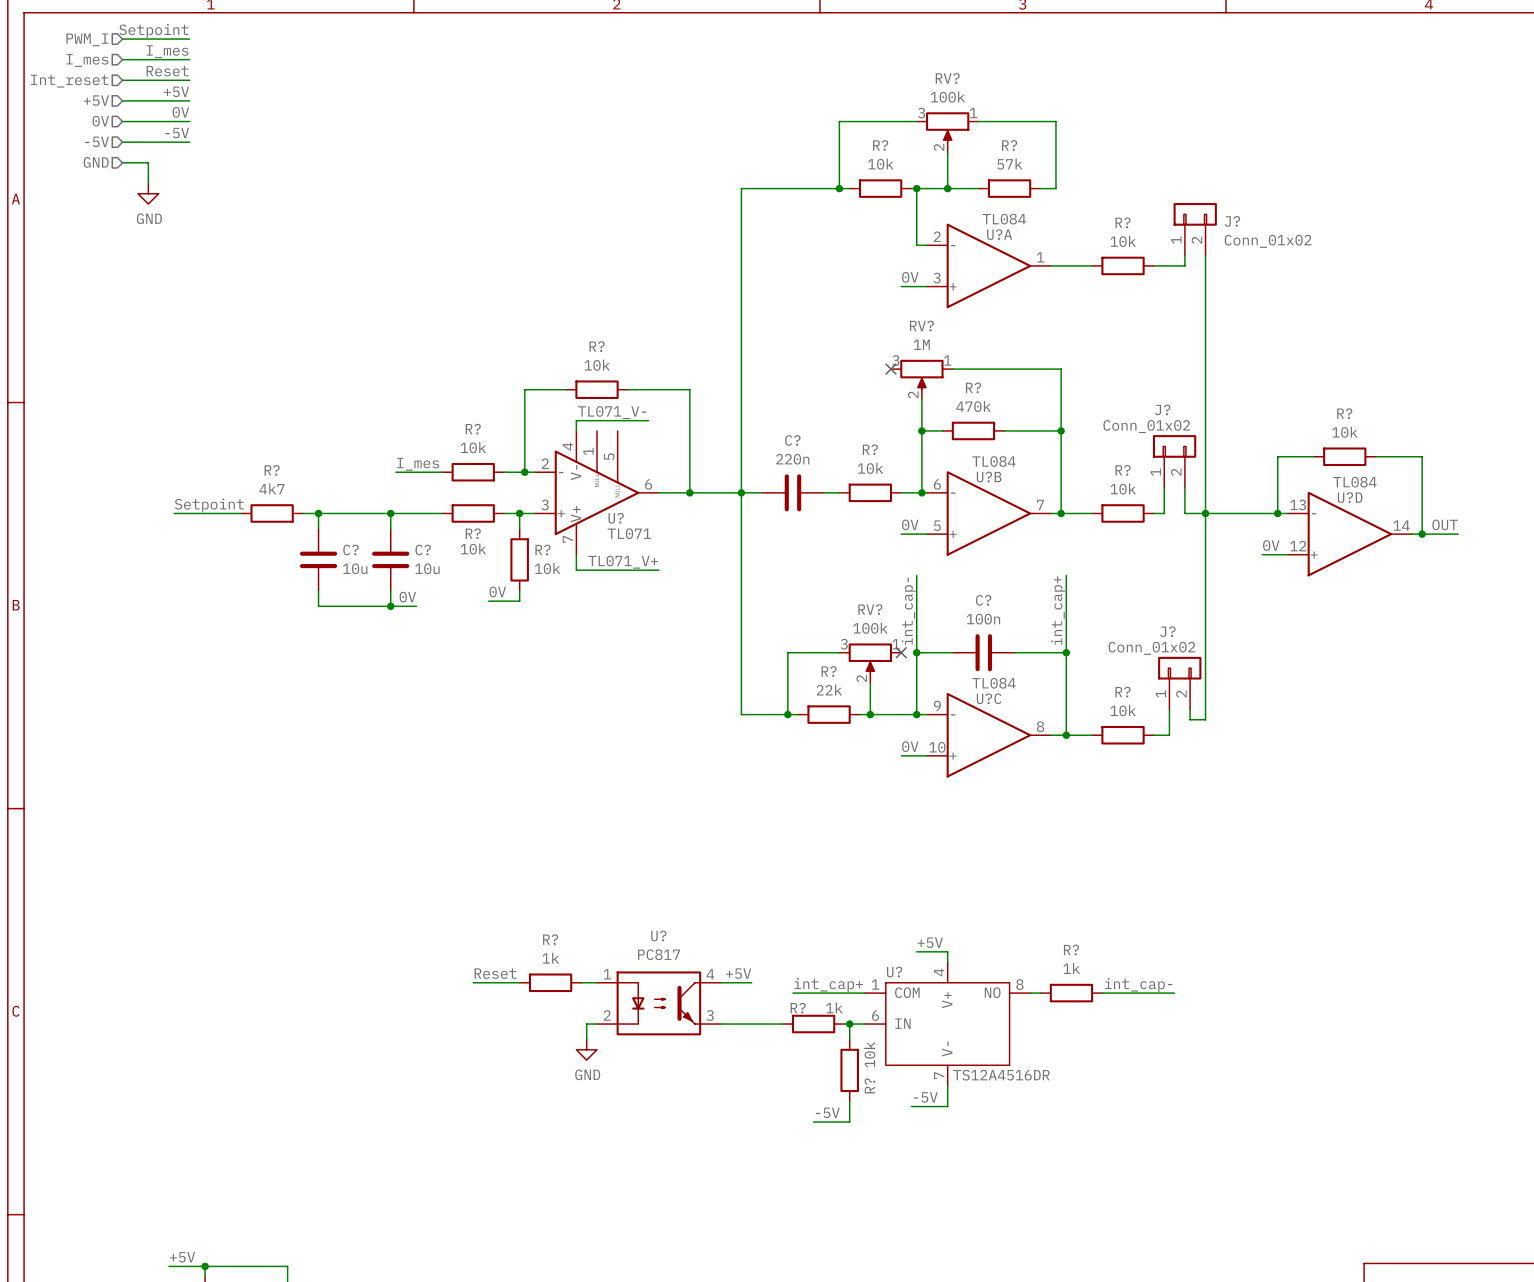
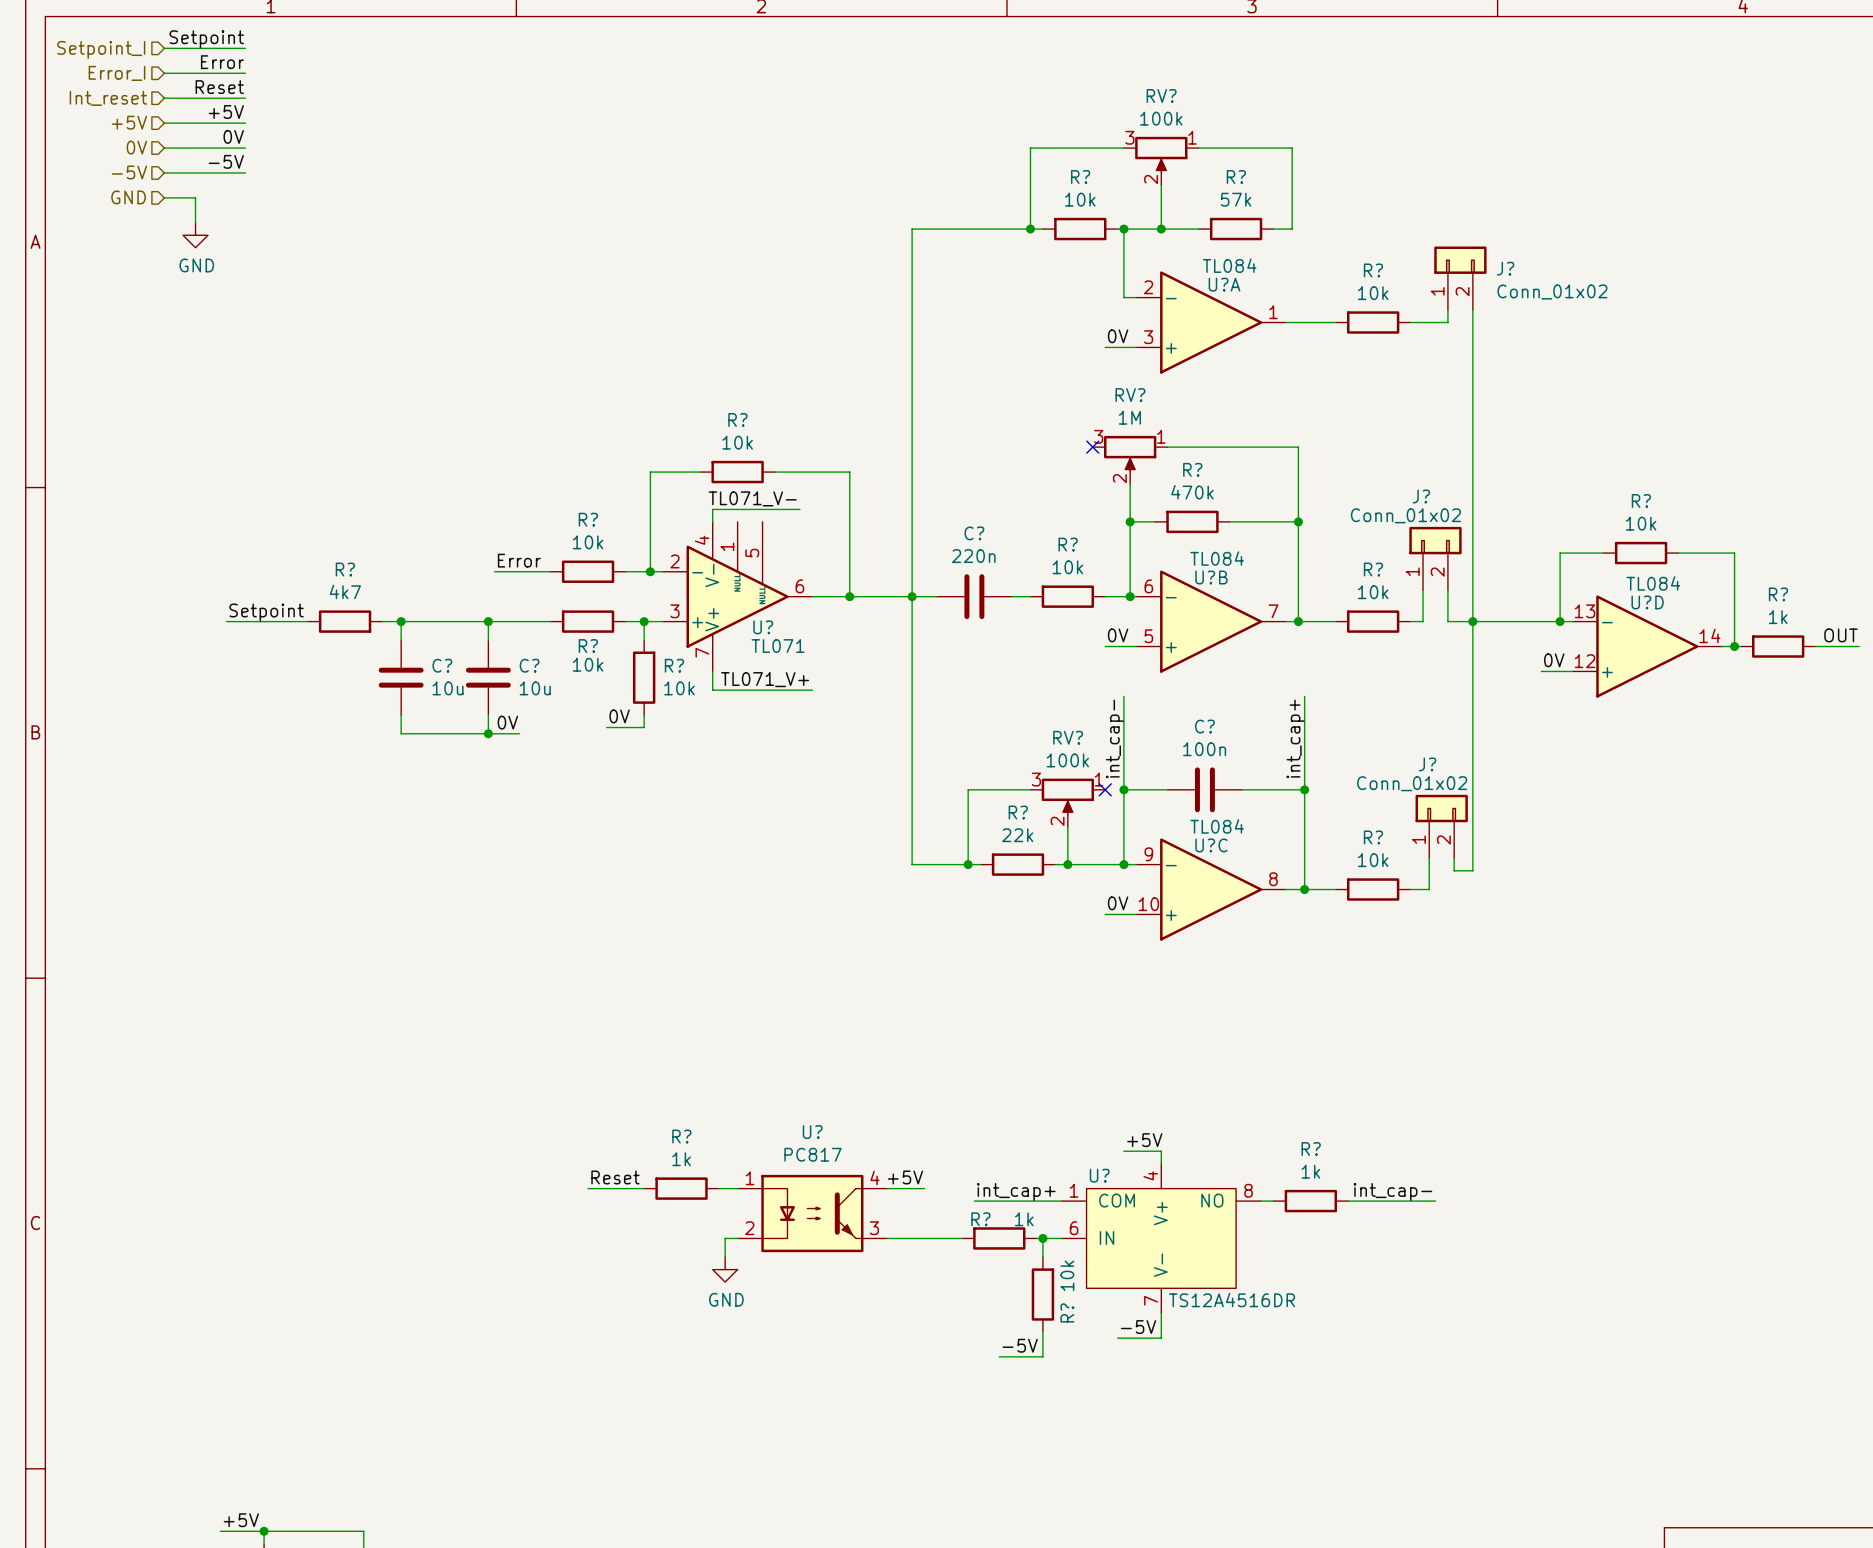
hierarchical label: PWM_I (87, 39) -> Setpoint_I (101, 49)
label: I_mes (167, 51) -> Error (222, 62)
hierarchical label: I_mes (87, 60) -> Error_I (117, 73)
label: I_mes (418, 464) -> Error (519, 560)
label position: OUT (1445, 524) -> OUT (1840, 635)
wire: (1427, 534) (1458, 534) -> none
R?: none -> 1k (1778, 646)
wire: none -> (1815, 646) (1859, 646)

